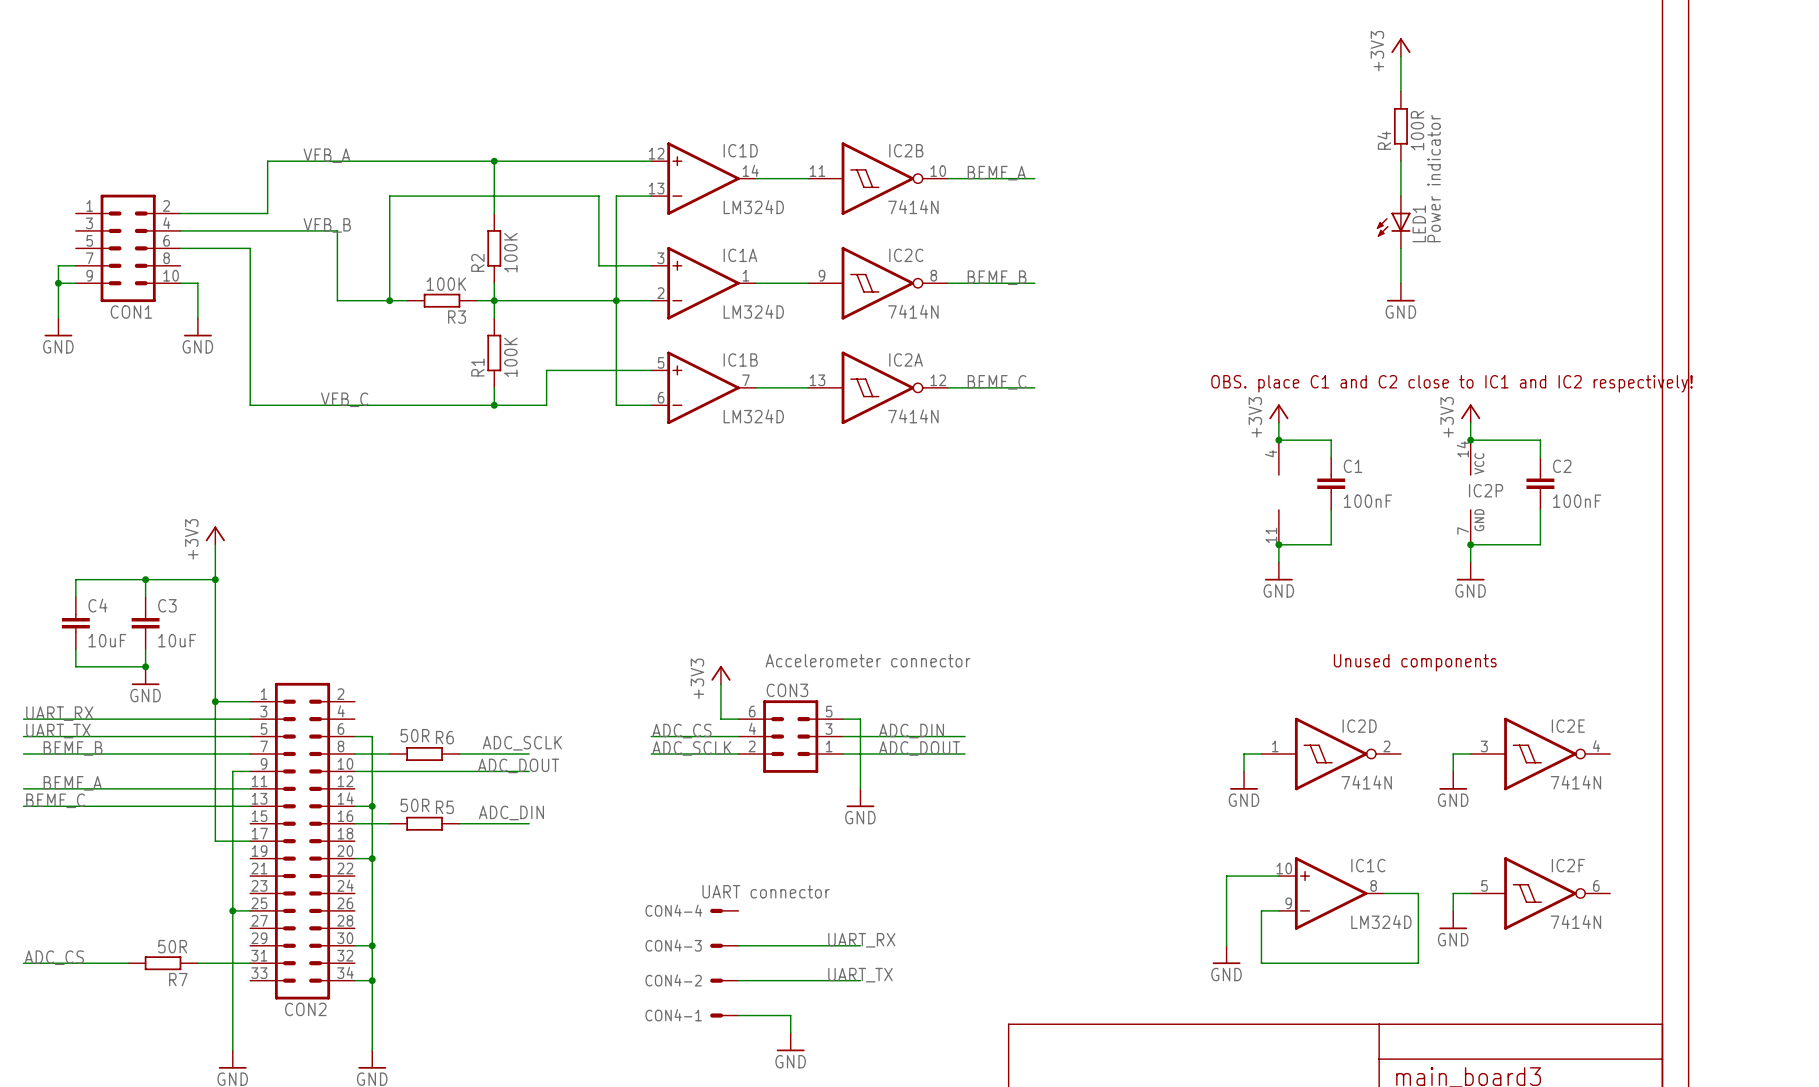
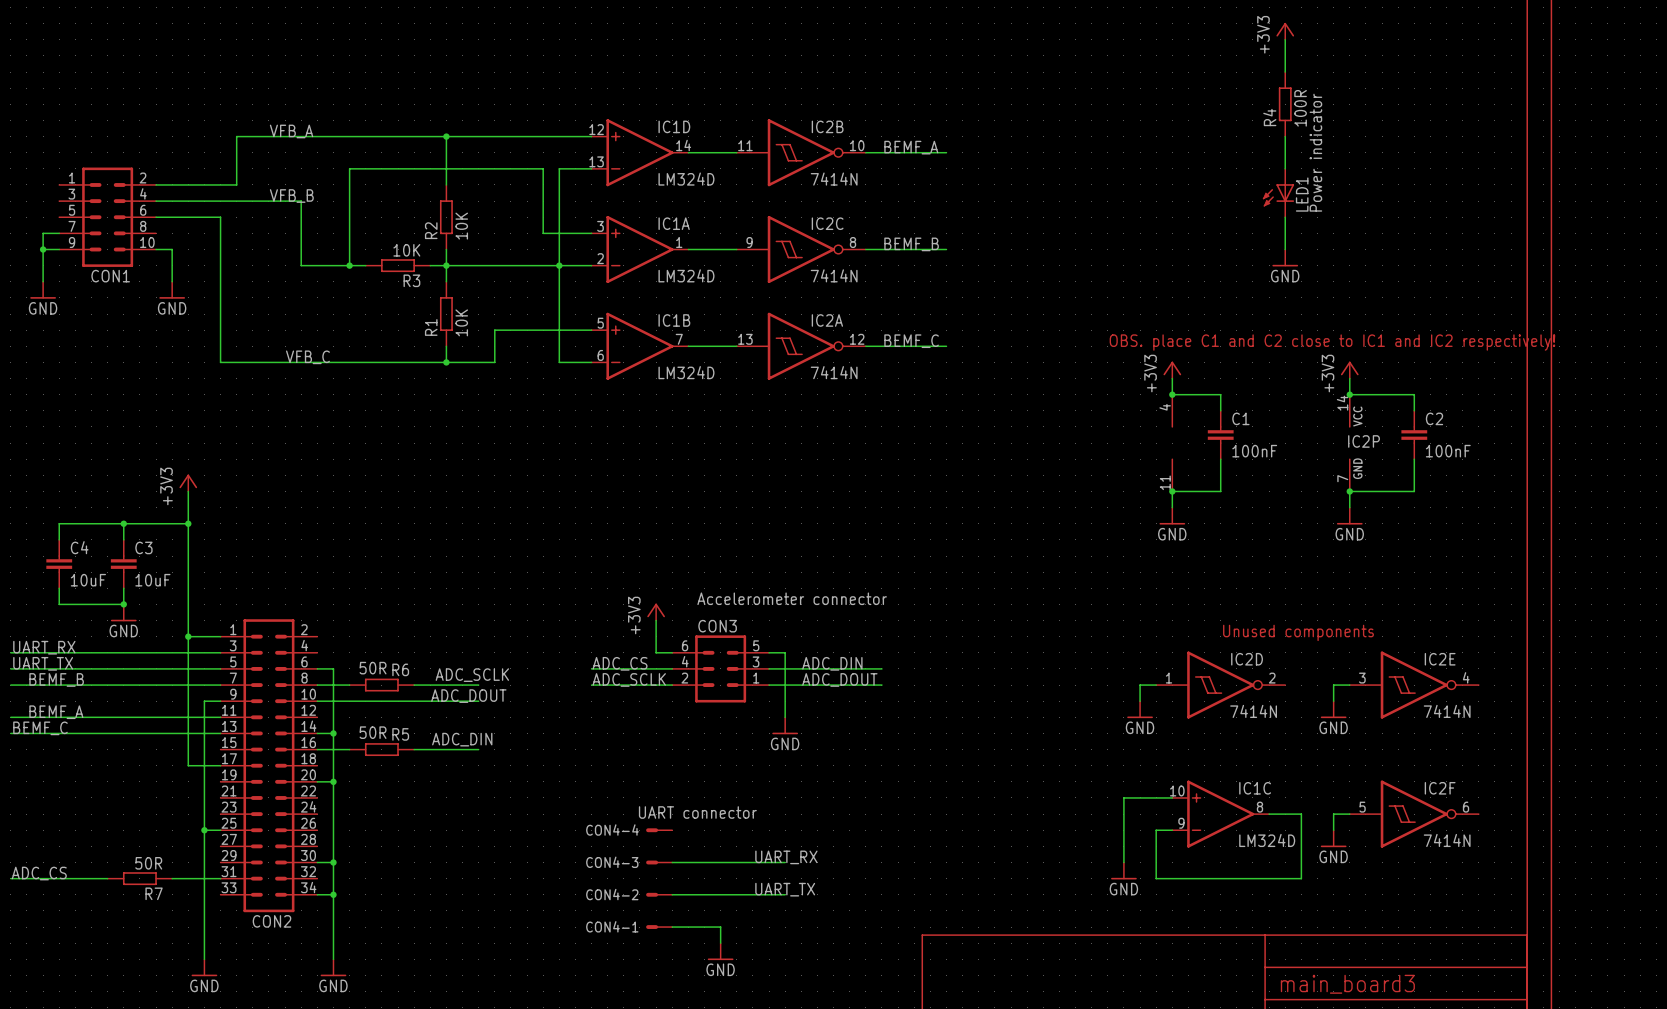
R2 value: 100K (510, 252) -> 10K (461, 226)
R3 value: 100K (446, 284) -> 10K (406, 250)
R1 value: 100K (510, 357) -> 10K (461, 322)
text position: Unused components (1415, 662) -> Unused components (1298, 632)

